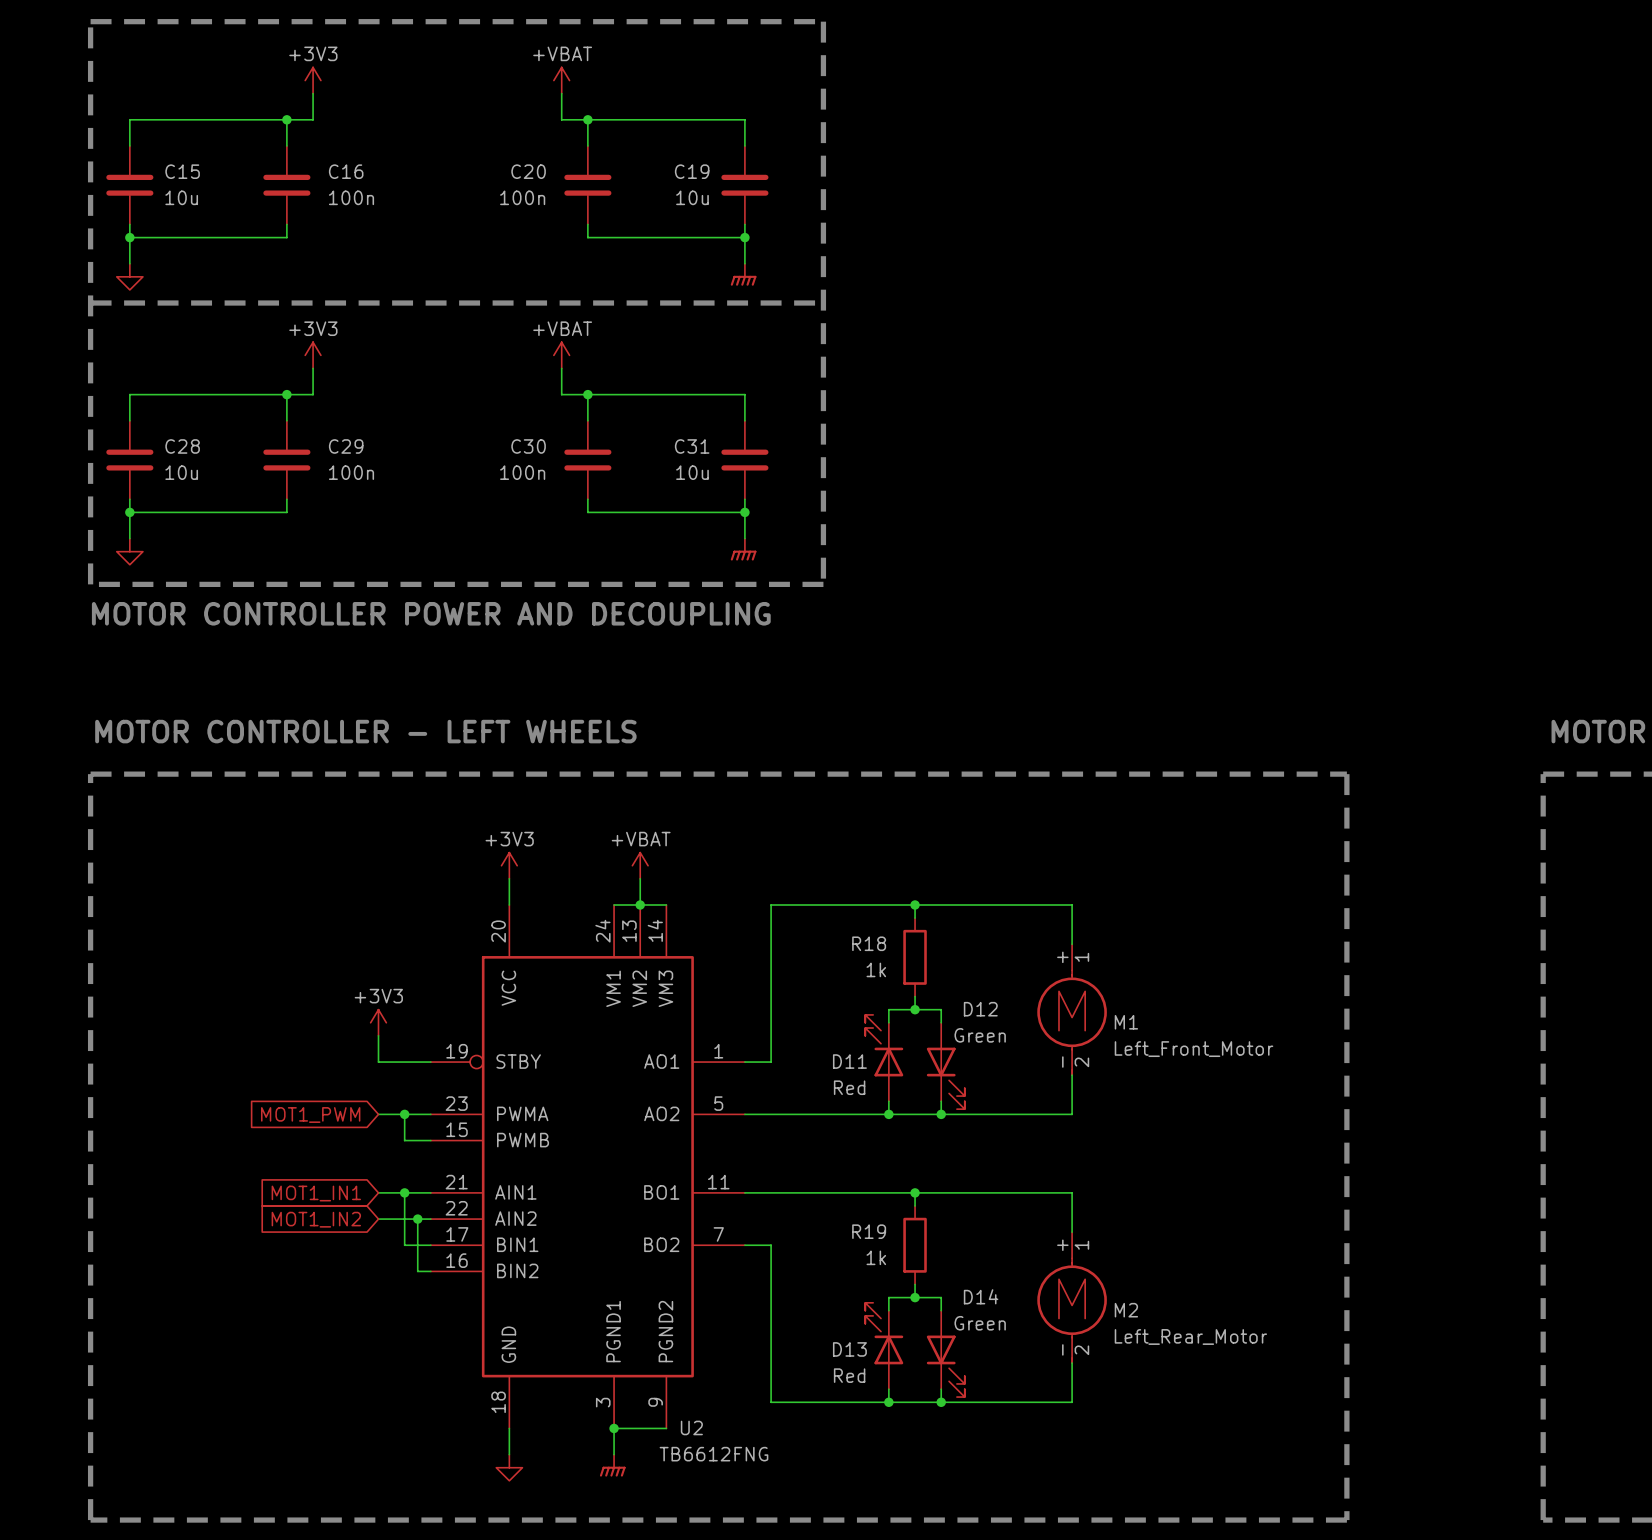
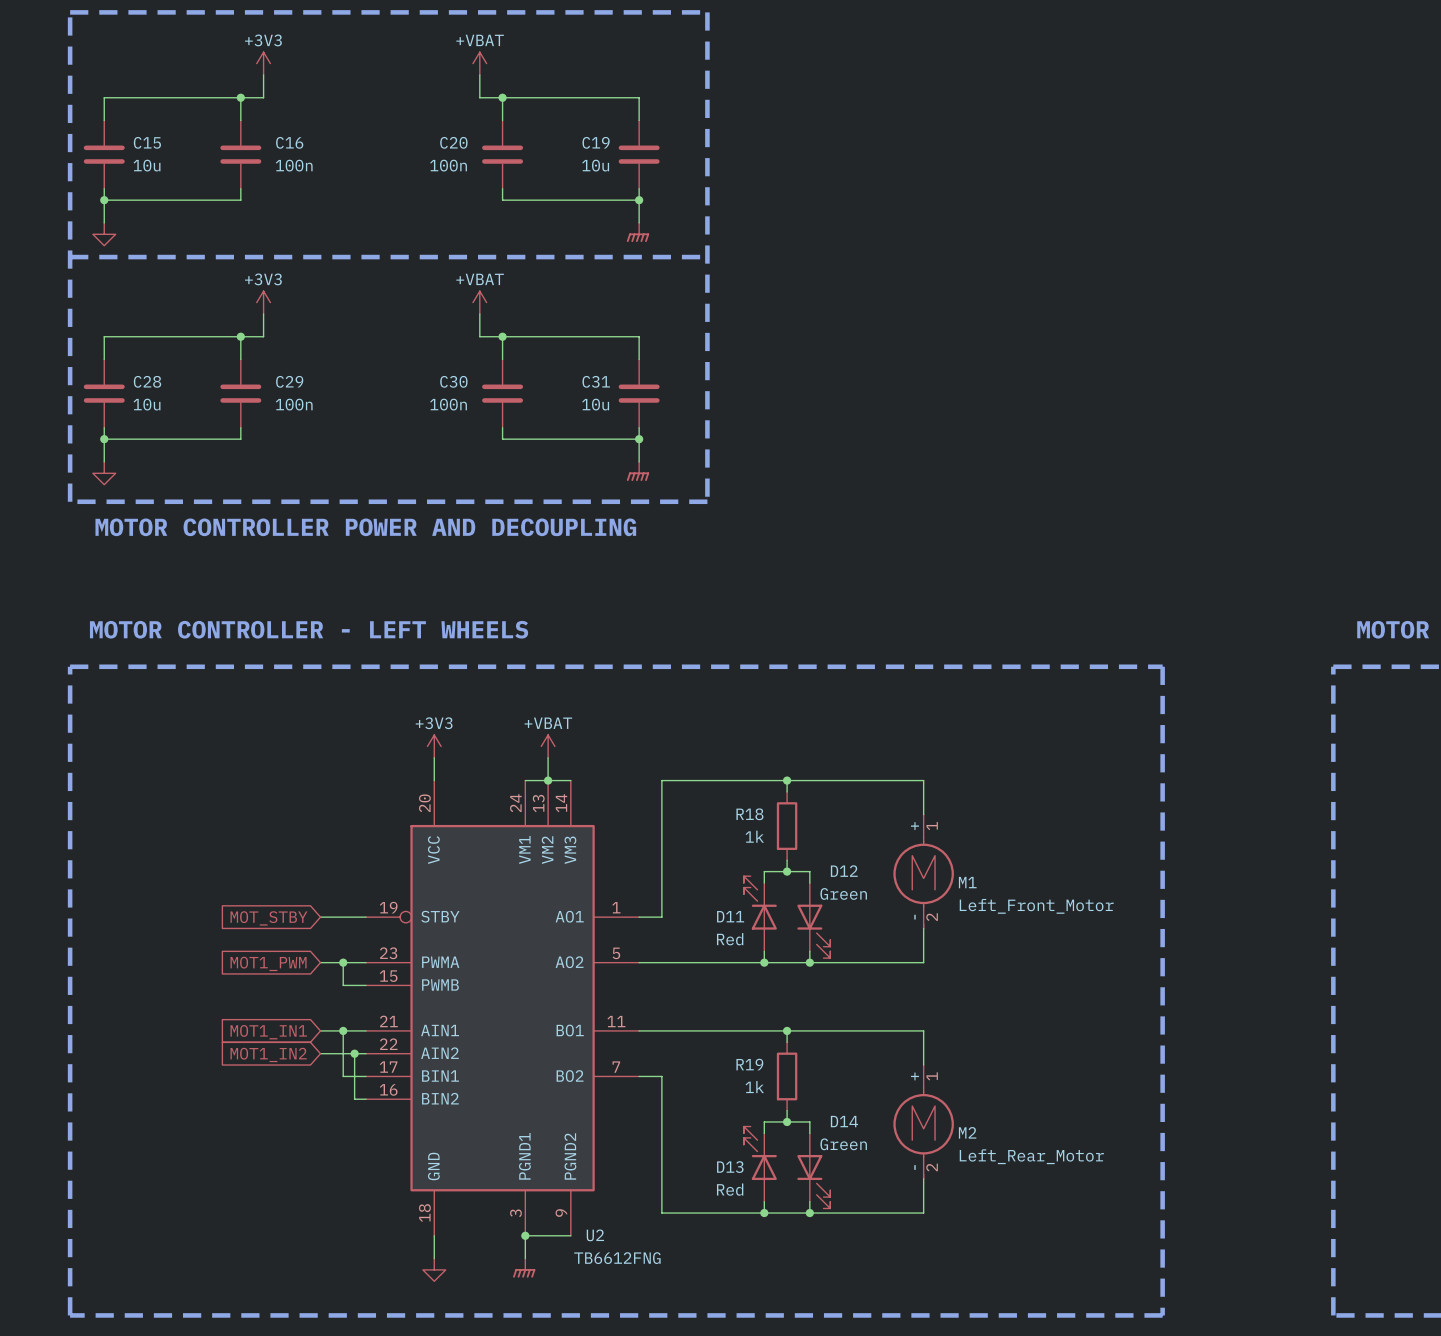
power symbol: +3V3 (378, 1022) -> none
wire: (378, 1035) (378, 1062) -> none
global label: none -> MOT_STBY (268, 918)

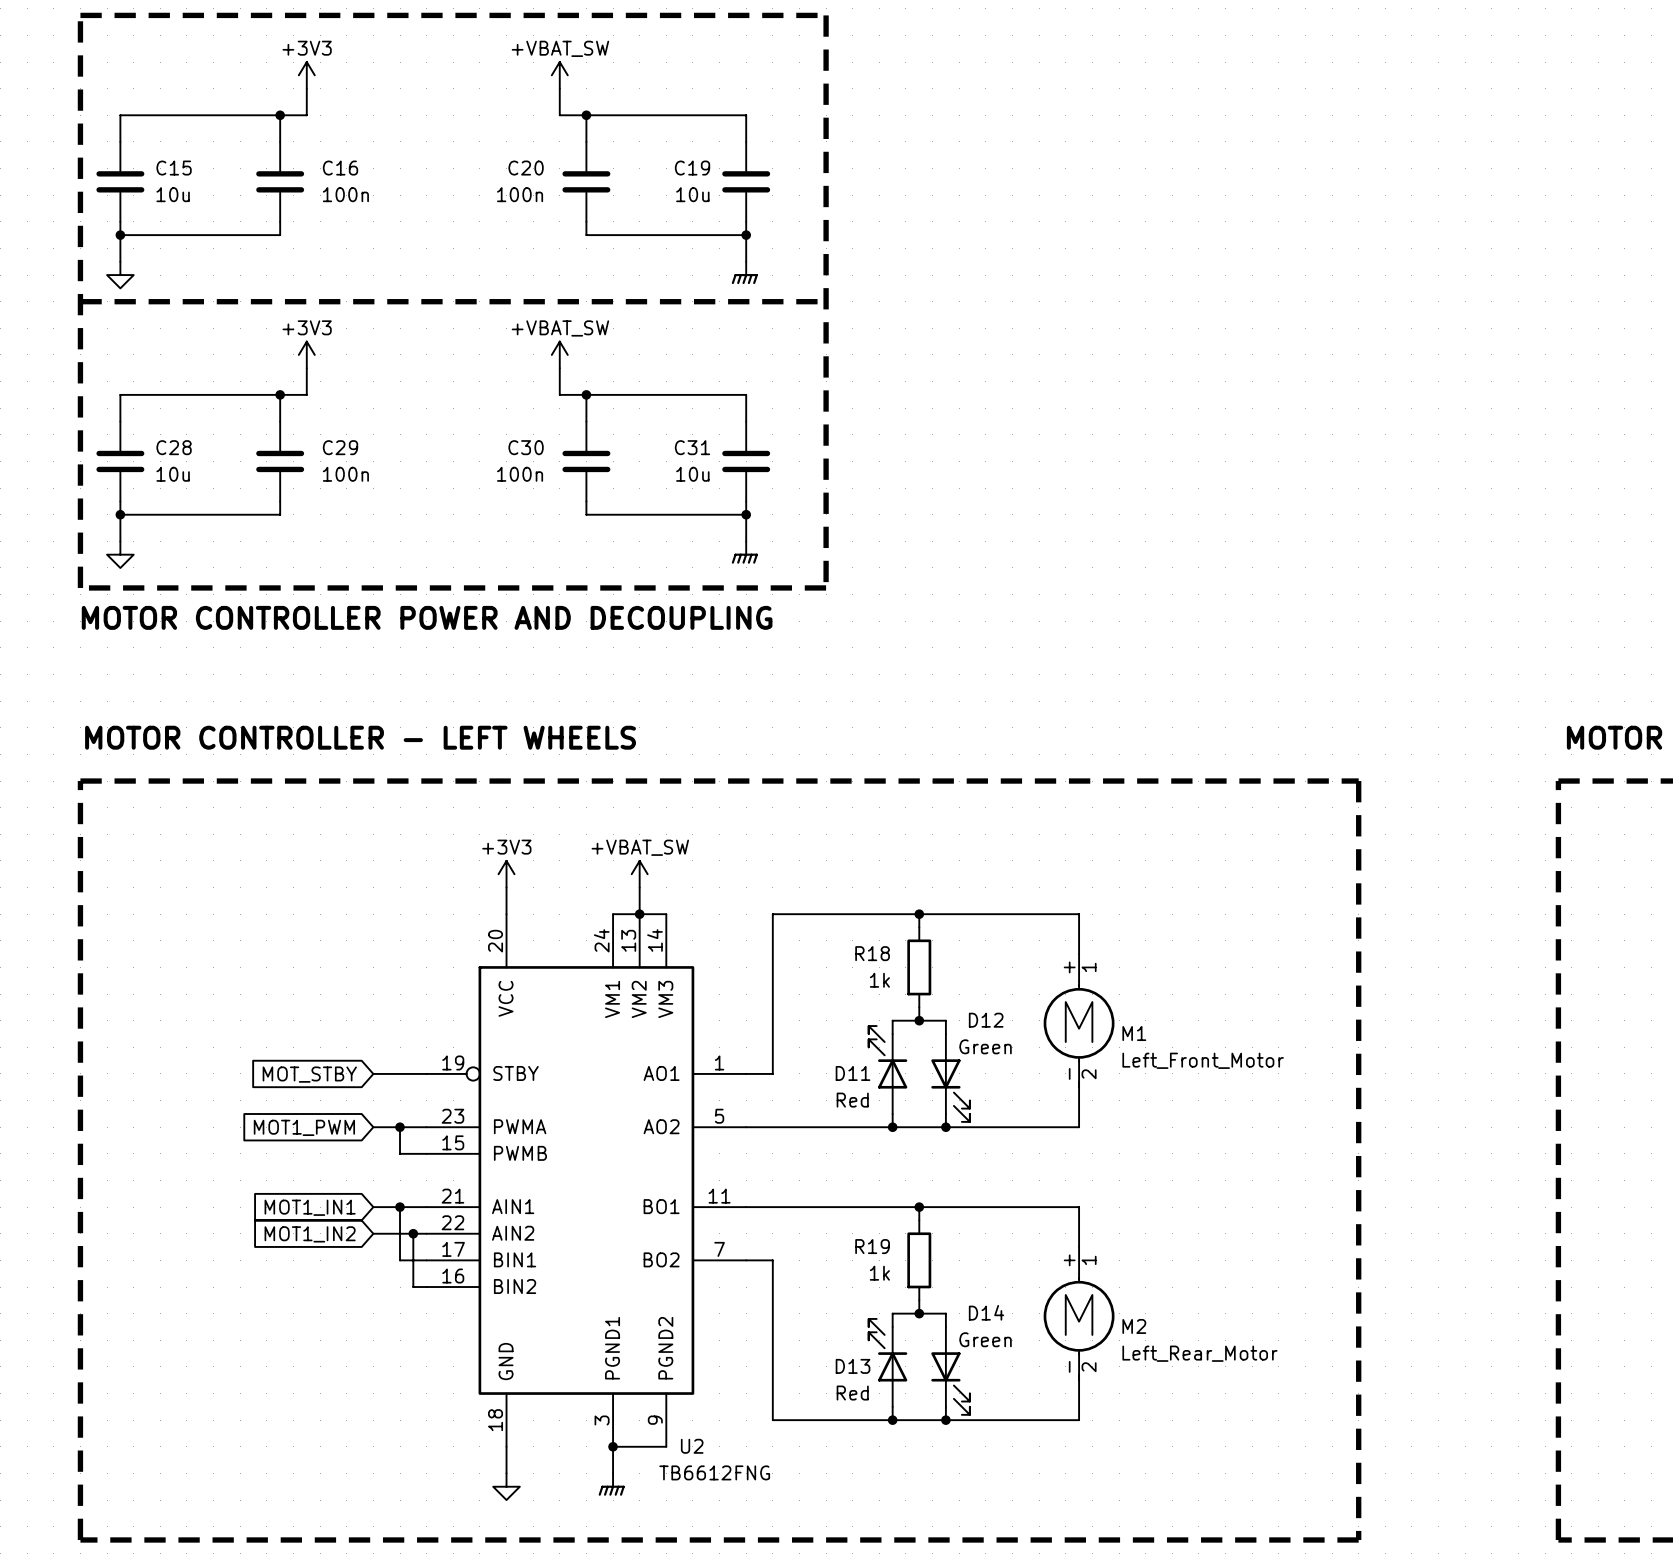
power symbol: +VBAT (479, 63) -> +VBAT_SW (559, 75)
power symbol: +VBAT (479, 302) -> +VBAT_SW (559, 354)
power symbol: +VBAT (548, 746) -> +VBAT_SW (639, 874)

